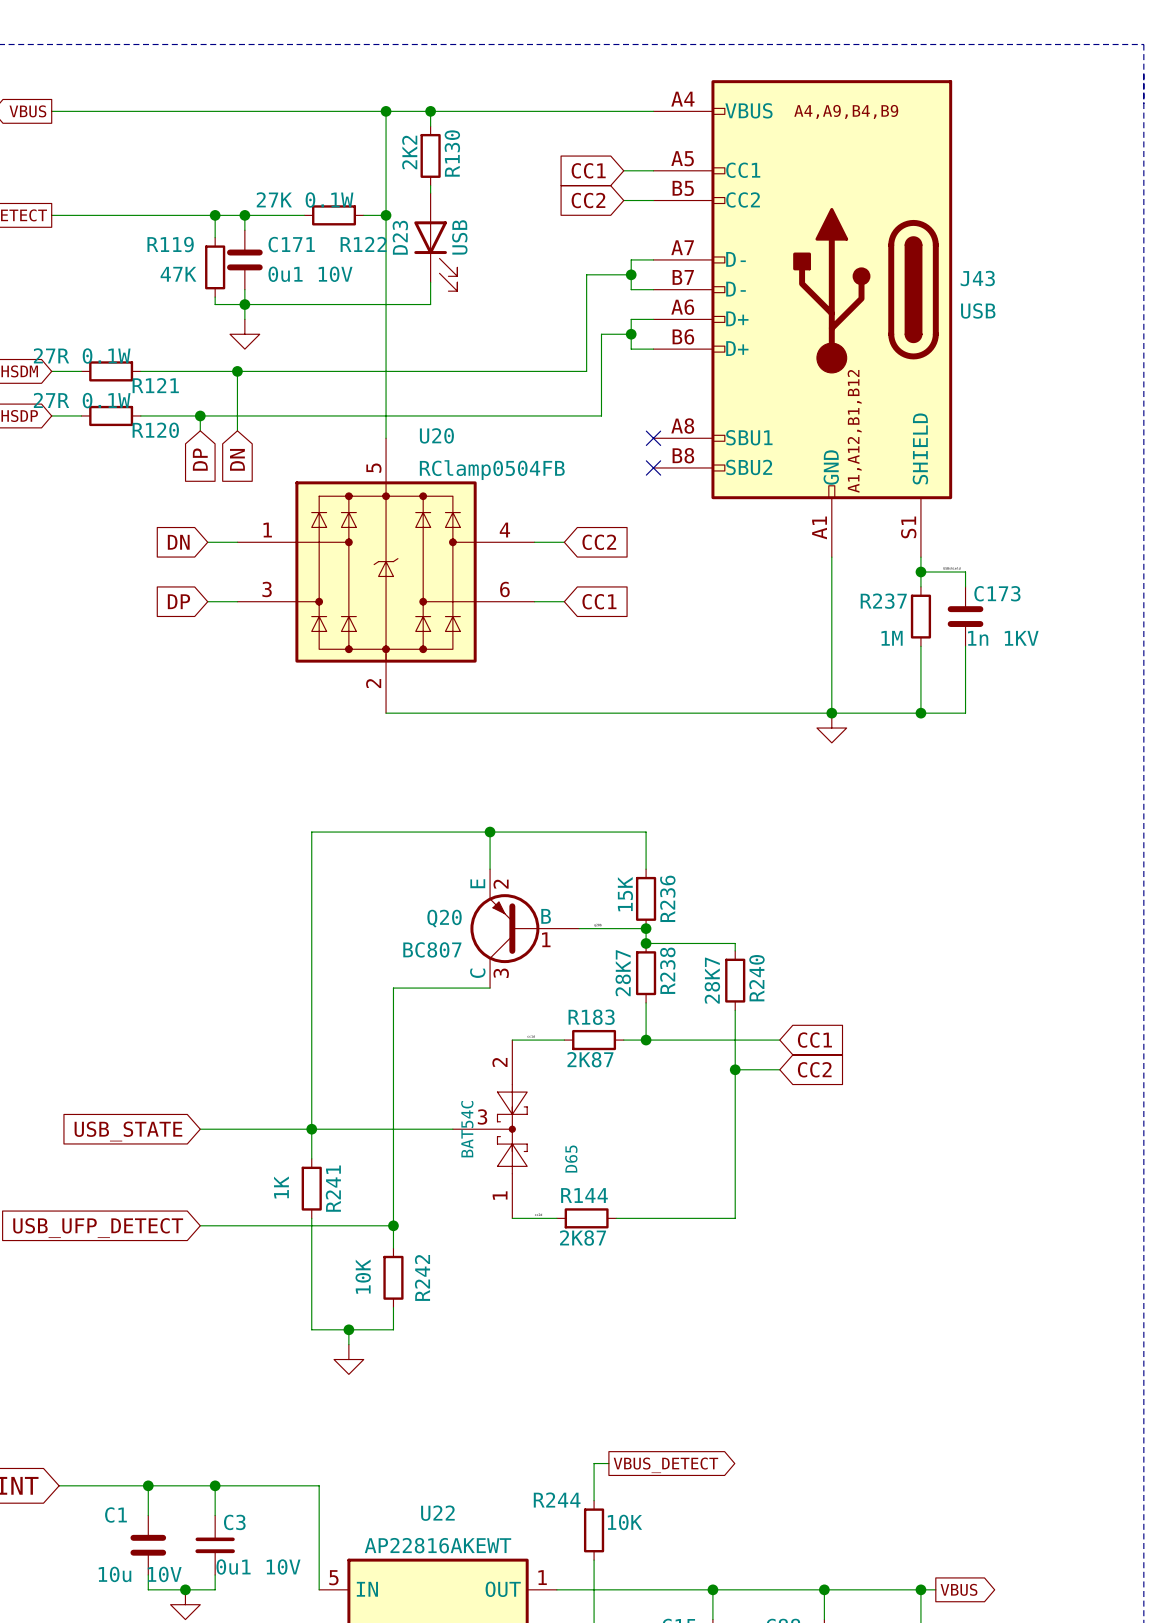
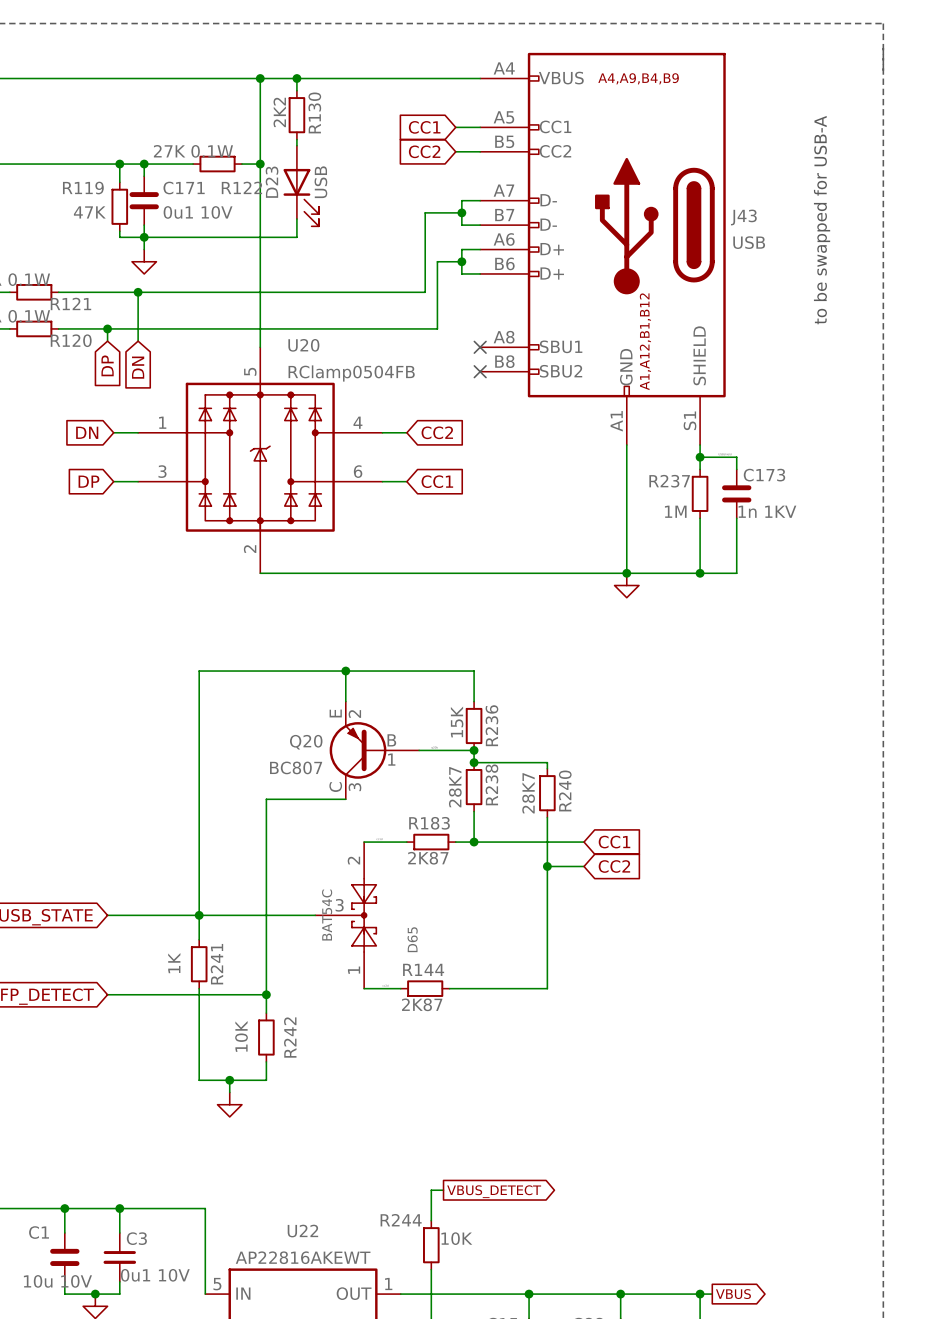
text: none -> to be swapped for USB-A (822, 220)

